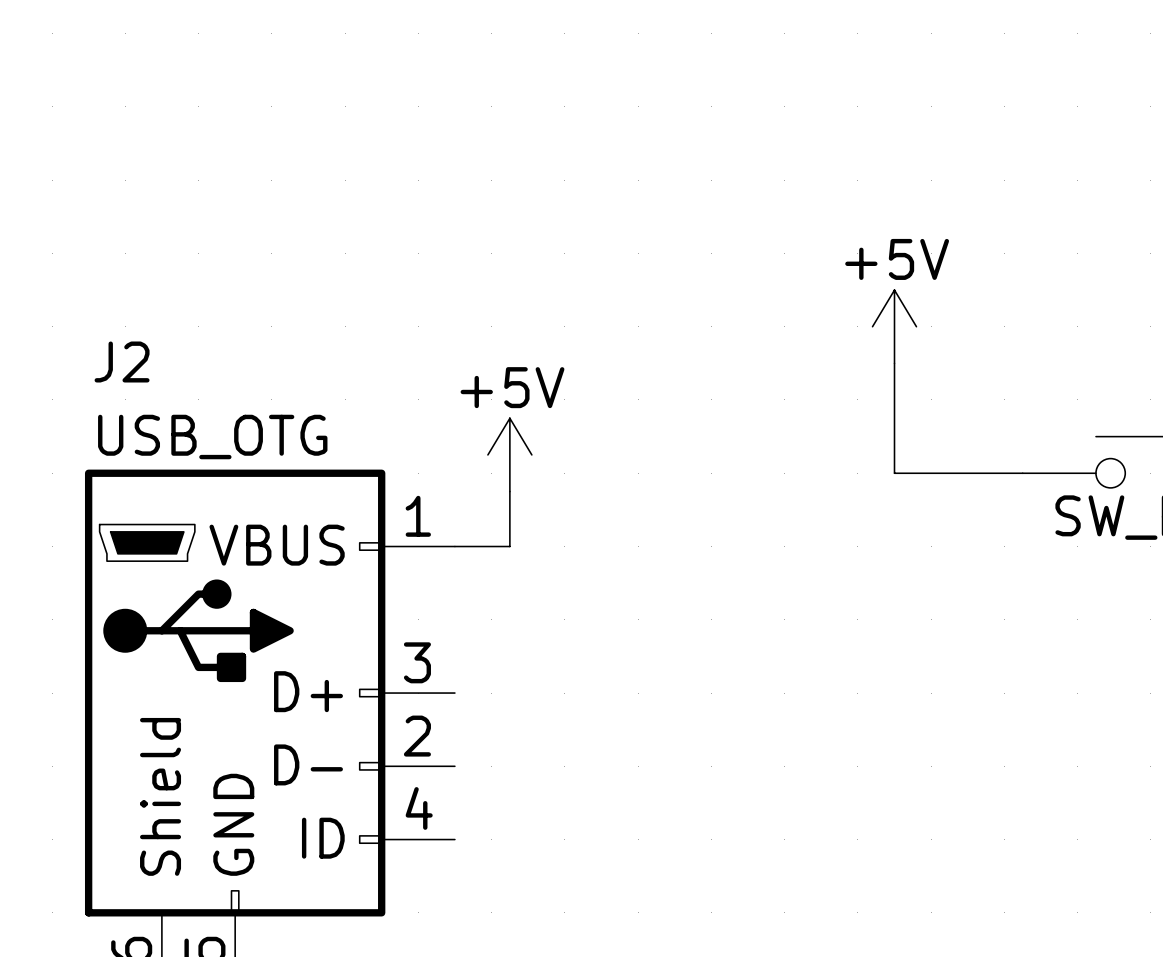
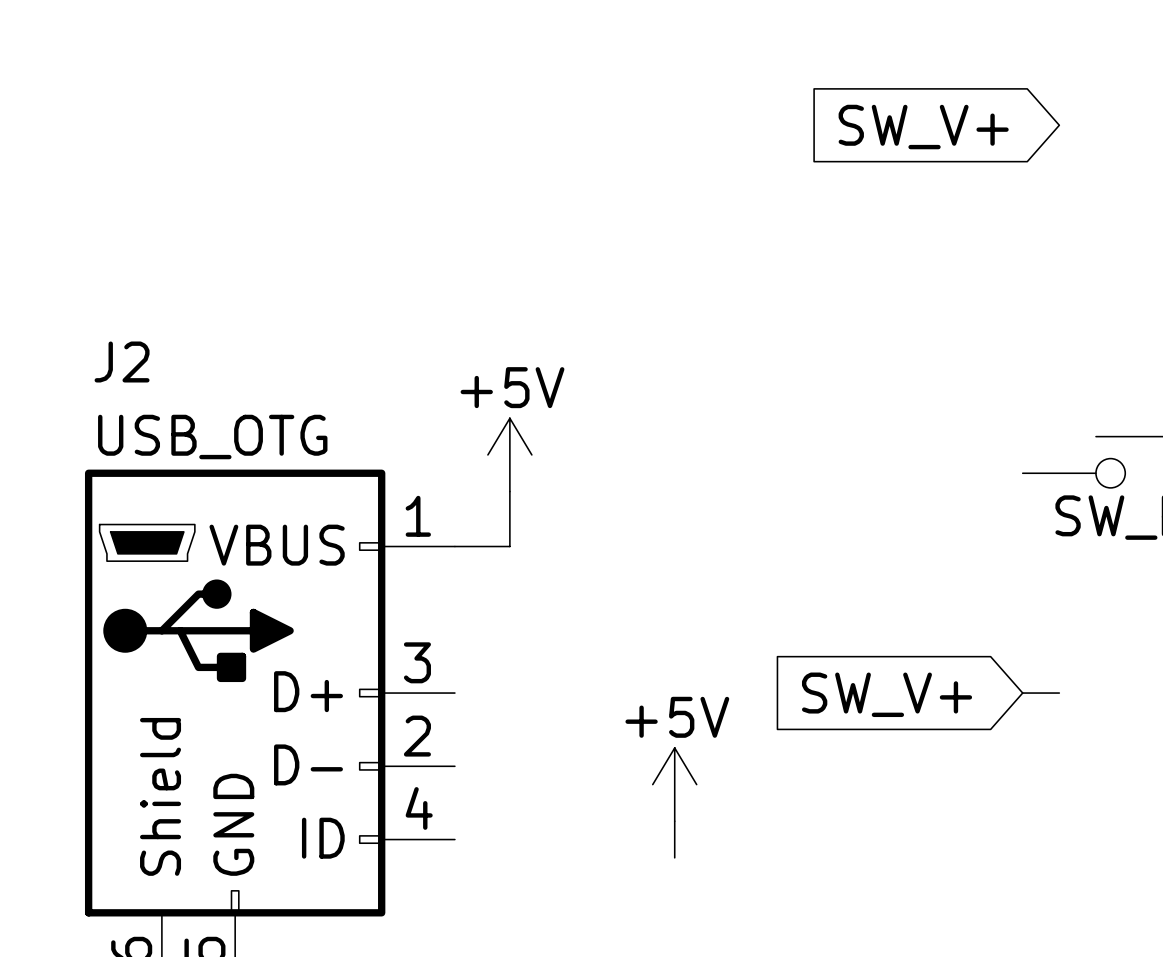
global label: none -> SW_V+ (923, 127)
power symbol: +5V (894, 326) -> none
wire: (894, 363) (894, 473) (1022, 473) -> none
wire: none -> (1022, 693) (1059, 693)
global label: none -> SW_V+ (887, 694)
power symbol: none -> +5V (674, 784)
wire: none -> (674, 821) (674, 857)

